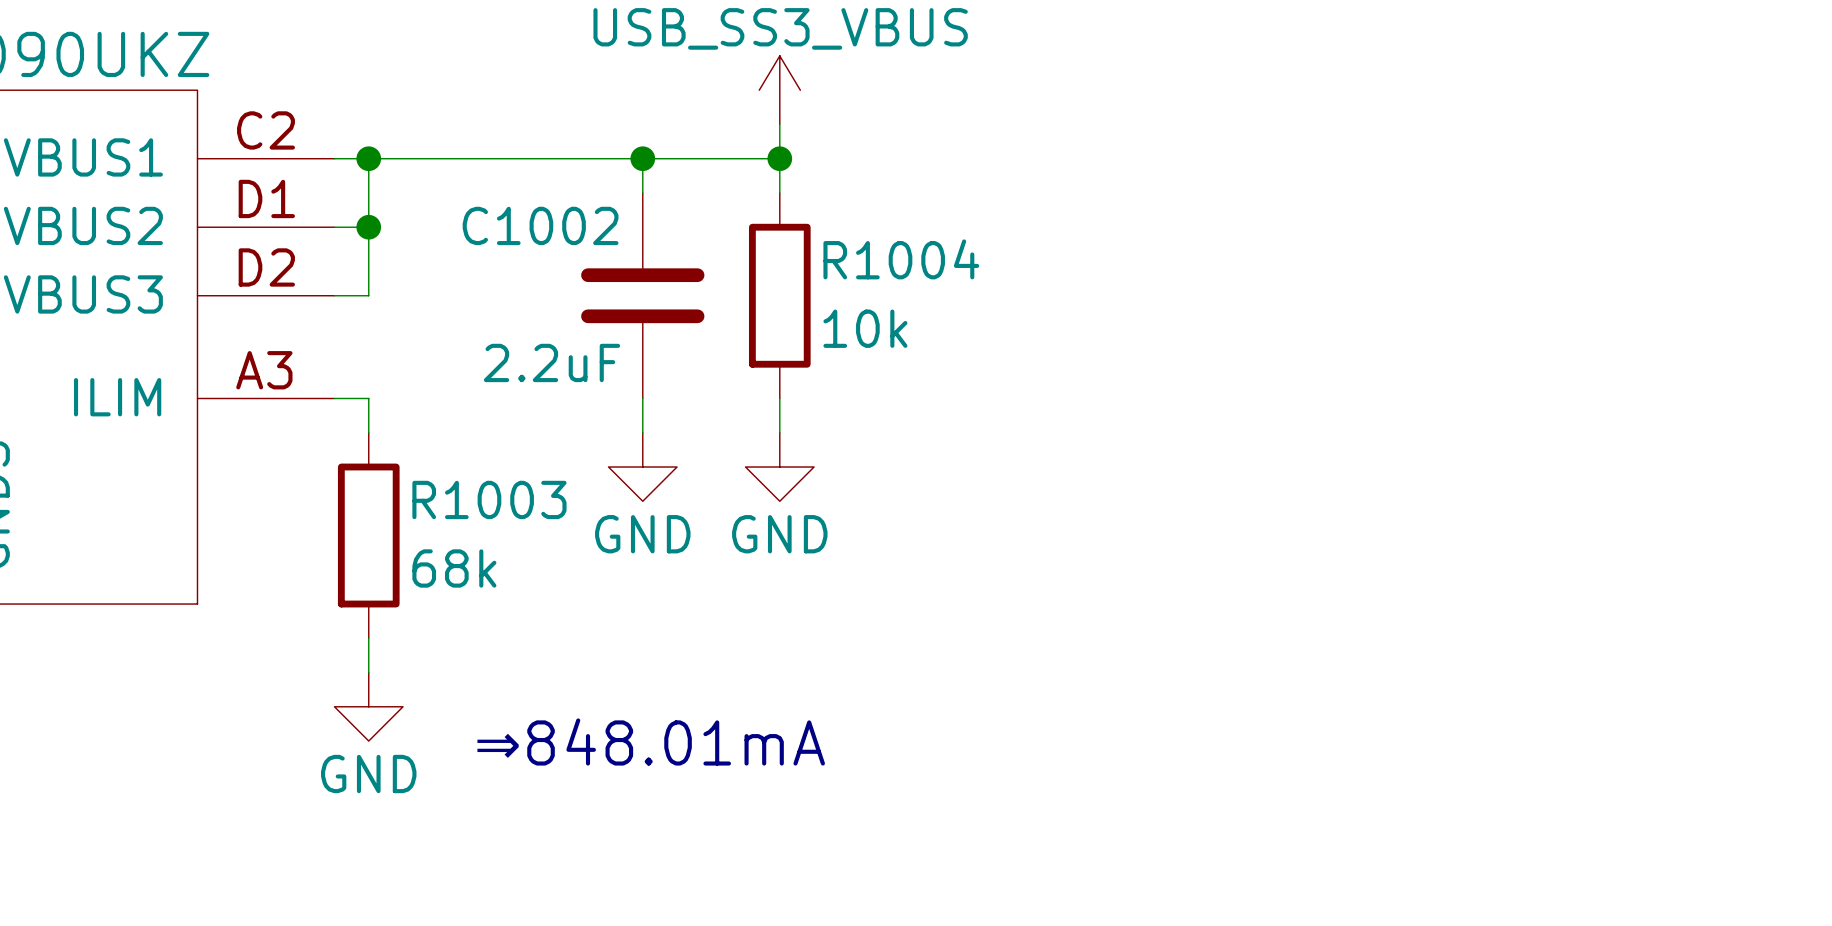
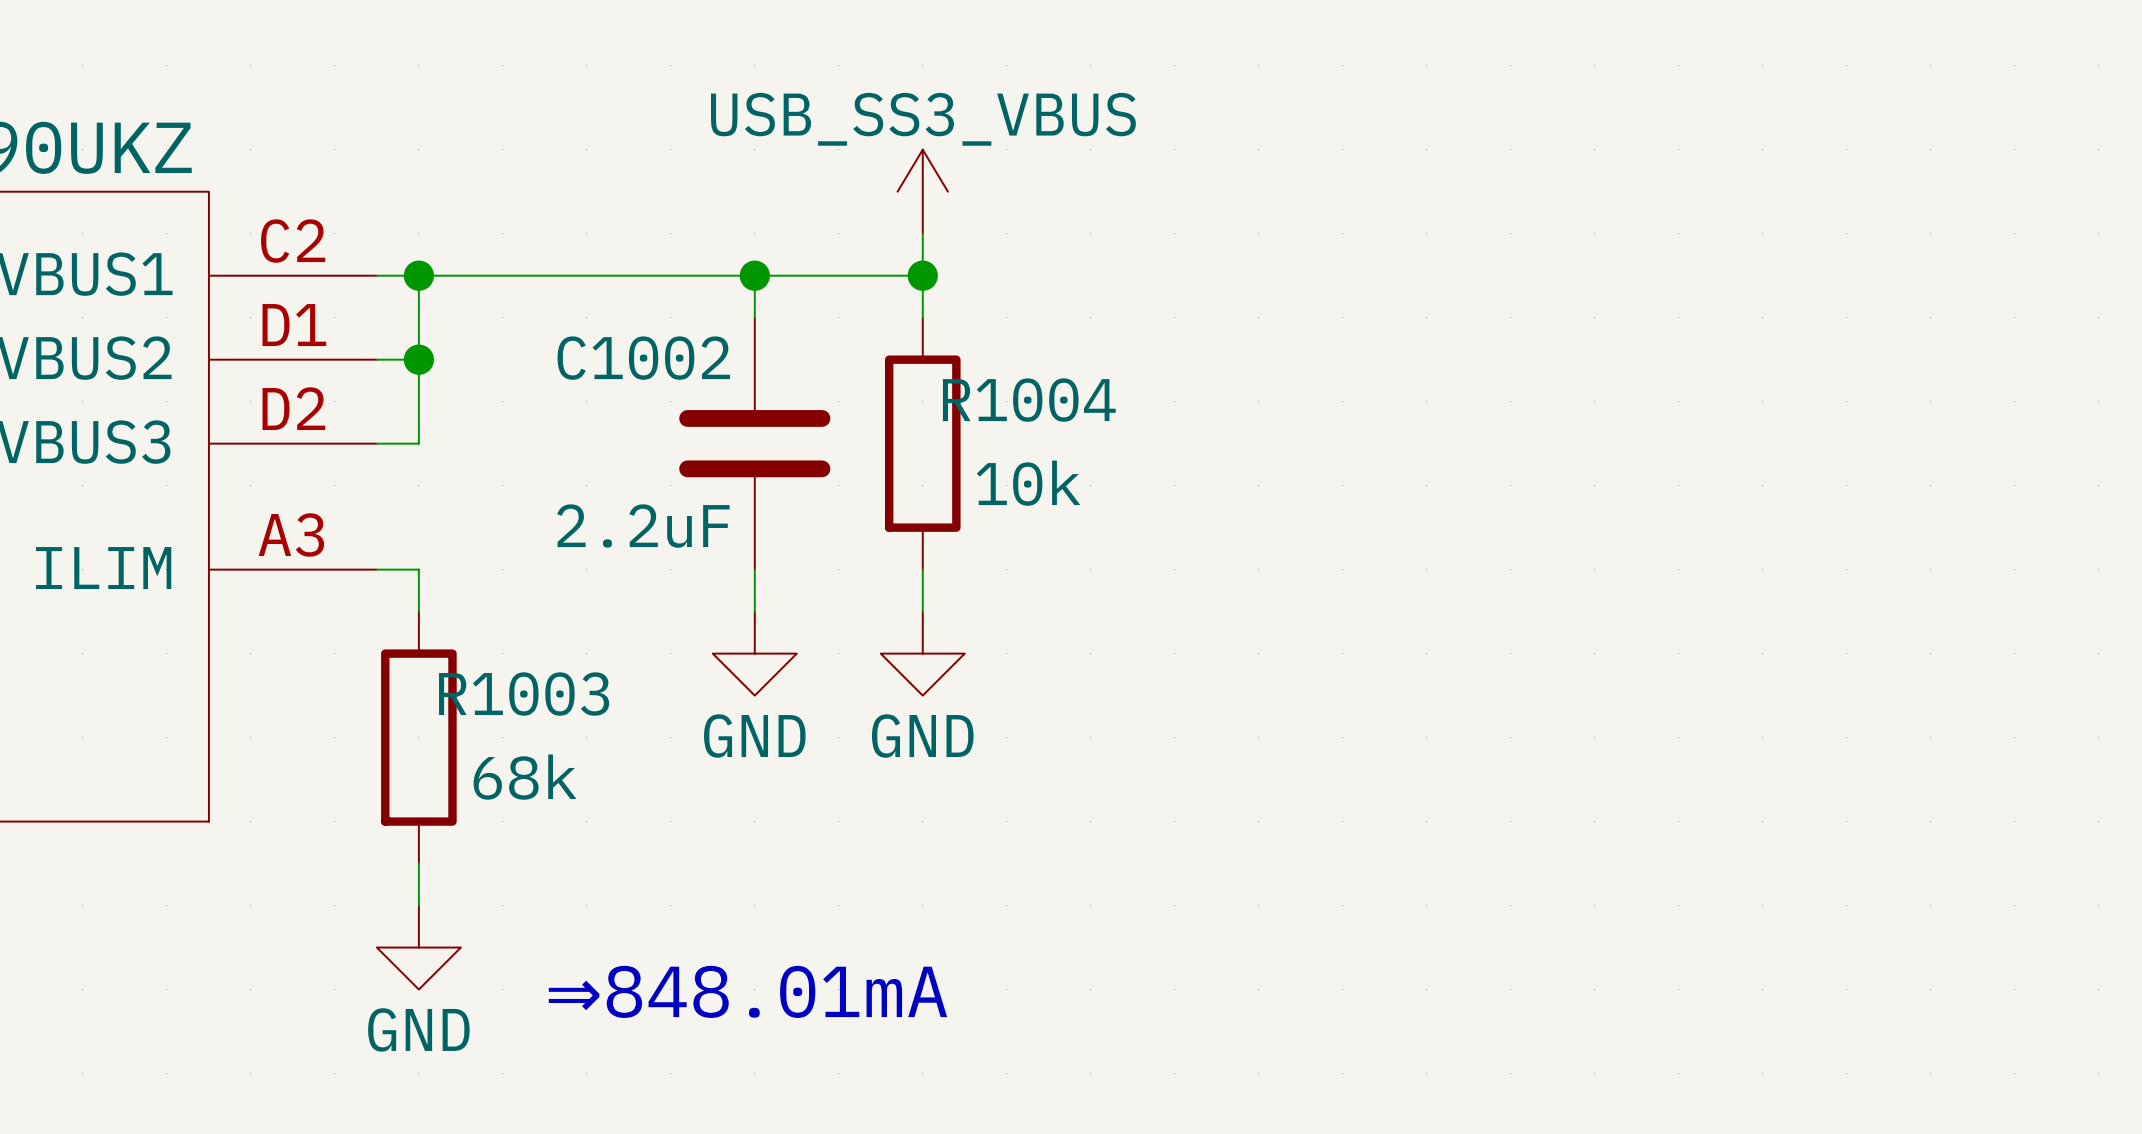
R1004 name position: R1004 (901, 259) -> R1004 (1029, 400)
R1003 name position: R1003 (489, 499) -> R1003 (524, 694)

